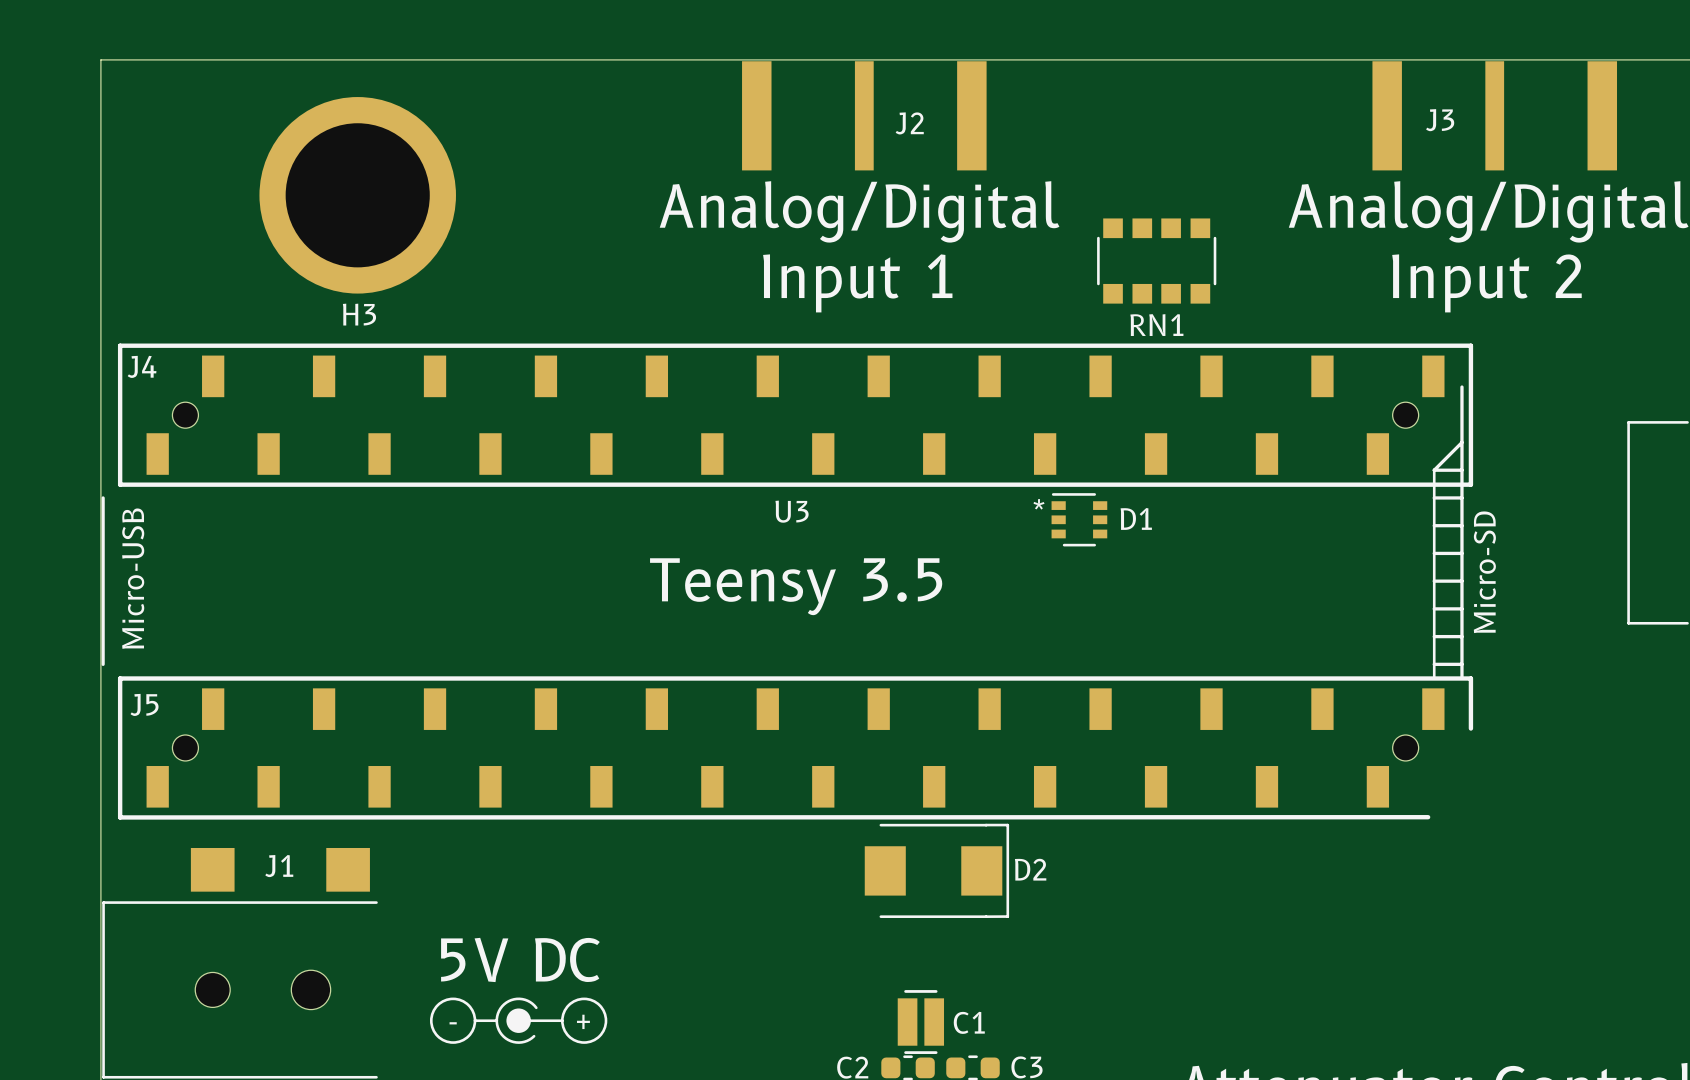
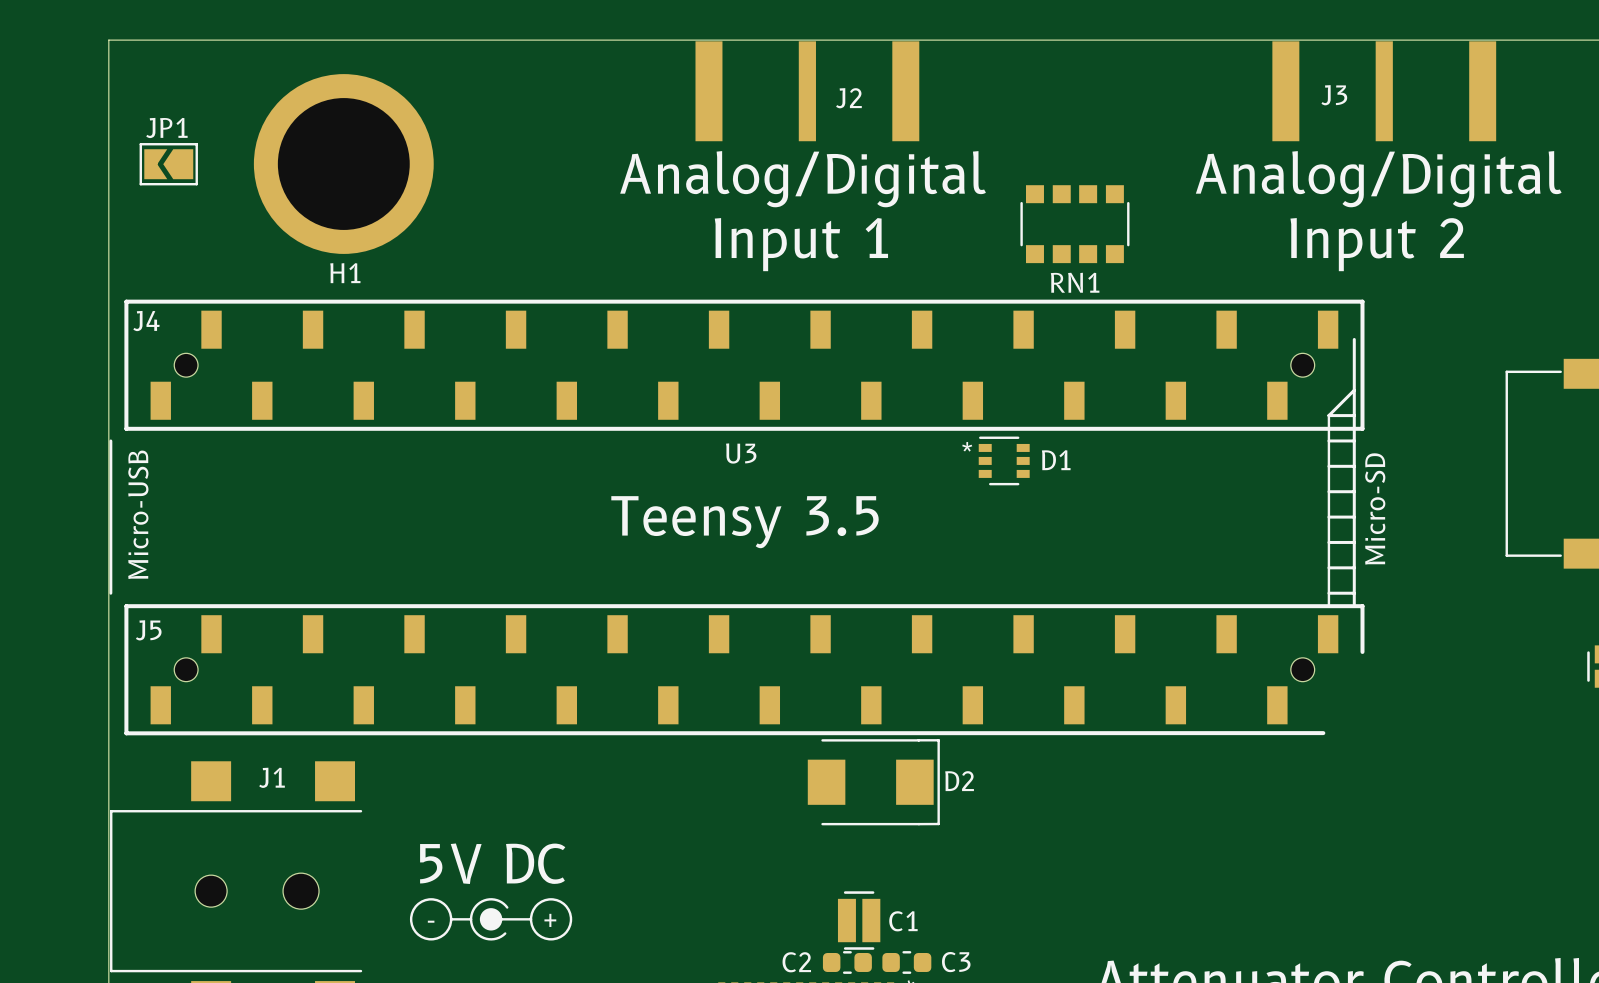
JP1: none -> (168, 164)
H3 name: H3 (359, 314) -> H1 (345, 273)

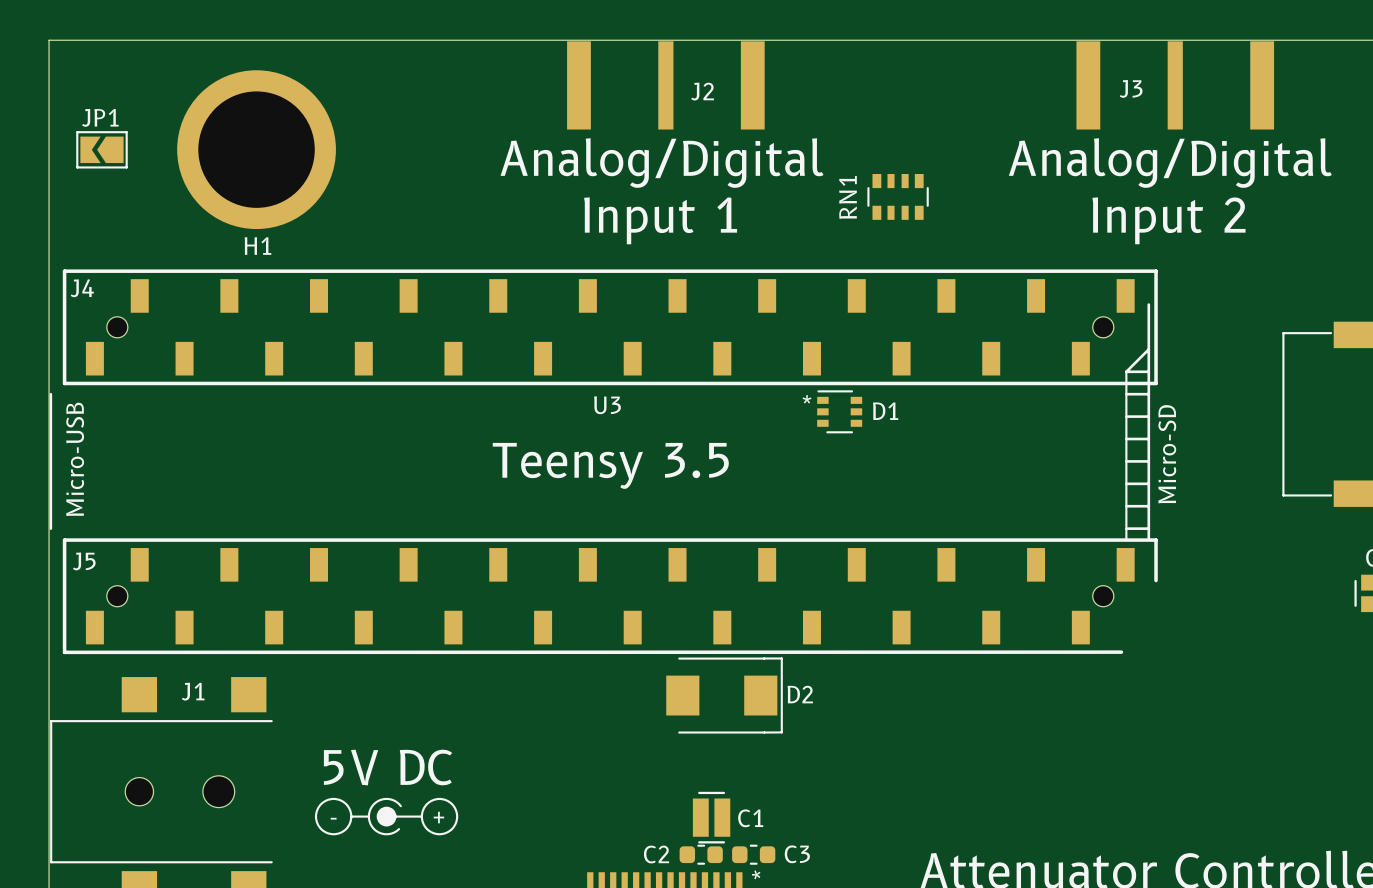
RN1 footprint: [1020, 185, 1130, 264] -> [867, 173, 929, 220]
RN1 name position: RN1 (1075, 282) -> RN1 (848, 197)

